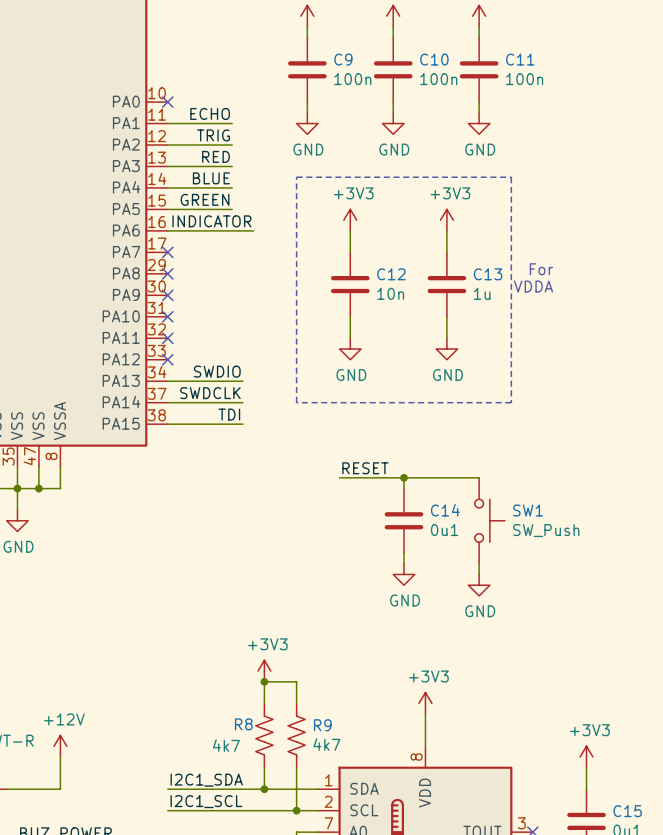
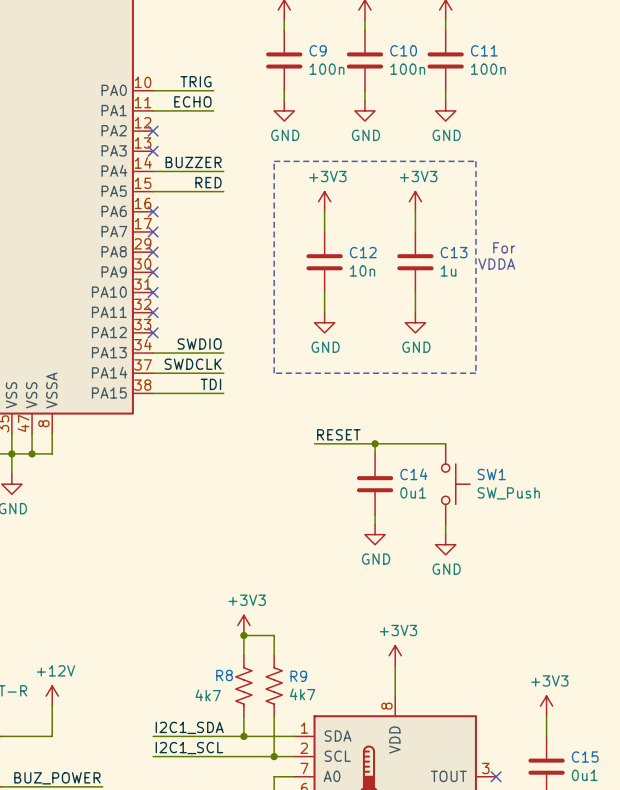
no-connect mark: (167, 102) -> none
label position: TRIG (213, 135) -> TRIG (196, 81)
wire: (167, 145) (232, 145) -> (153, 90) (213, 90)
no-connect mark: none -> (153, 131)
label position: RED (216, 156) -> RED (208, 182)
wire: (167, 166) (232, 166) -> none
no-connect mark: none -> (153, 151)
label: none -> BUZZER (193, 162)
label: BLUE (211, 178) -> none
wire: none -> (213, 171) (223, 171)
label: GREEN (205, 199) -> none
wire: none -> (213, 191) (223, 191)
label: INDICATOR (211, 221) -> none
wire: (167, 230) (253, 230) -> none
no-connect mark: none -> (153, 211)

